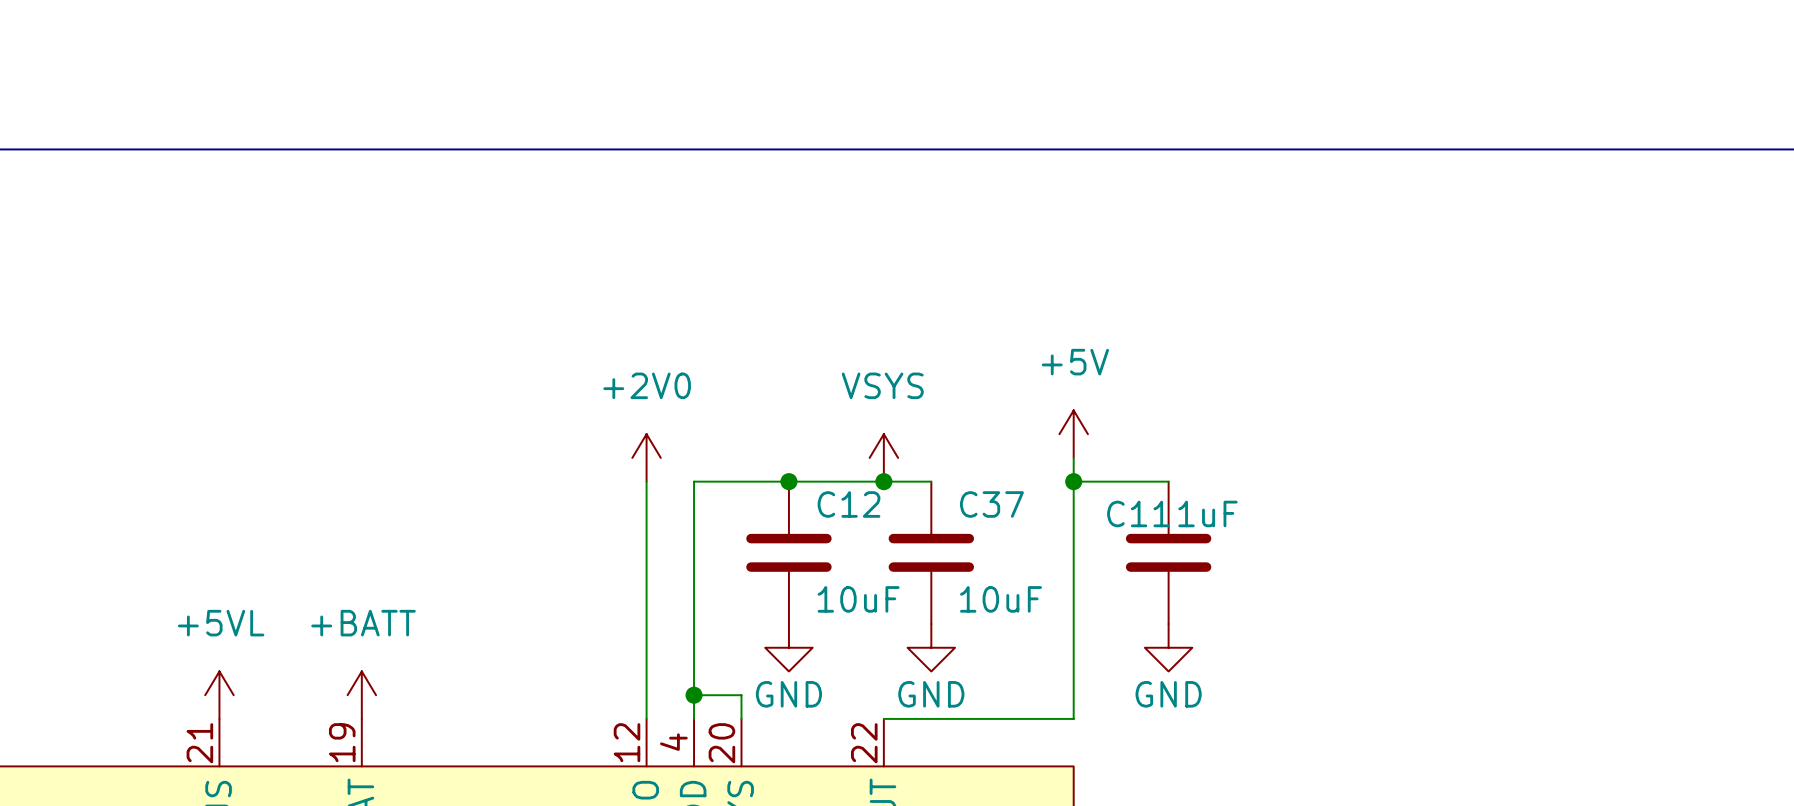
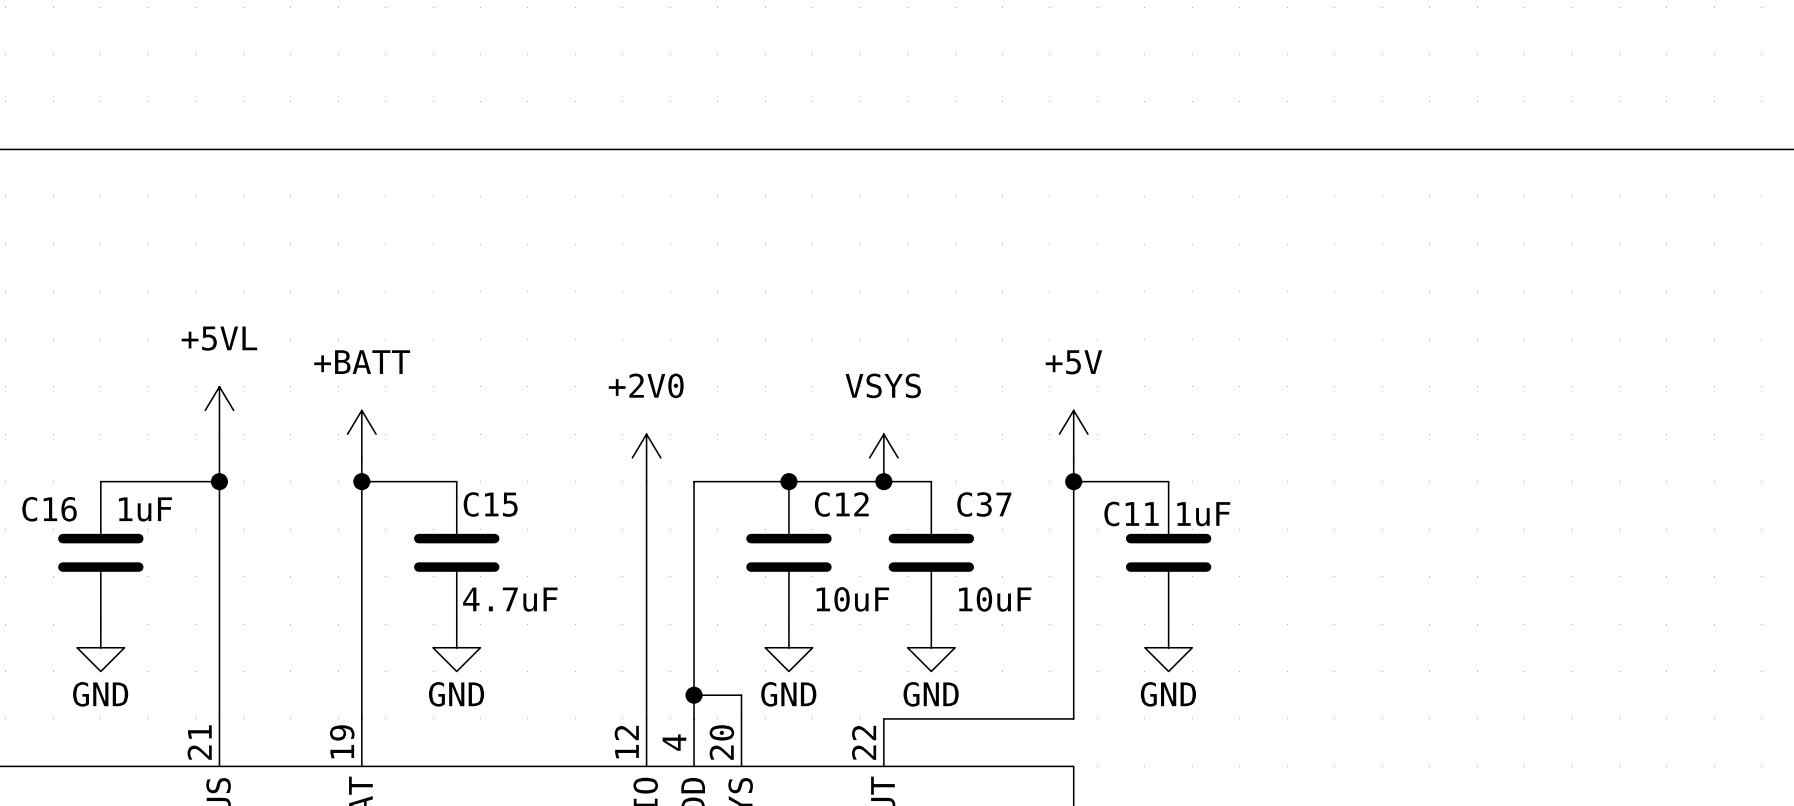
wire: none -> (219, 434) (219, 718)
wire: none -> (361, 457) (361, 718)
wire: none -> (100, 481) (219, 481)
junction: none -> (219, 481)
wire: none -> (361, 481) (456, 481)
junction: none -> (361, 481)
C16: none -> 1uF (100, 552)
C15: none -> 4.7uF (456, 552)
power symbol: none -> GND (100, 647)
power symbol: none -> GND (456, 647)
power symbol position: +5VL (219, 695) -> +5VL (219, 410)
power symbol position: +BATT (361, 695) -> +BATT (361, 434)

